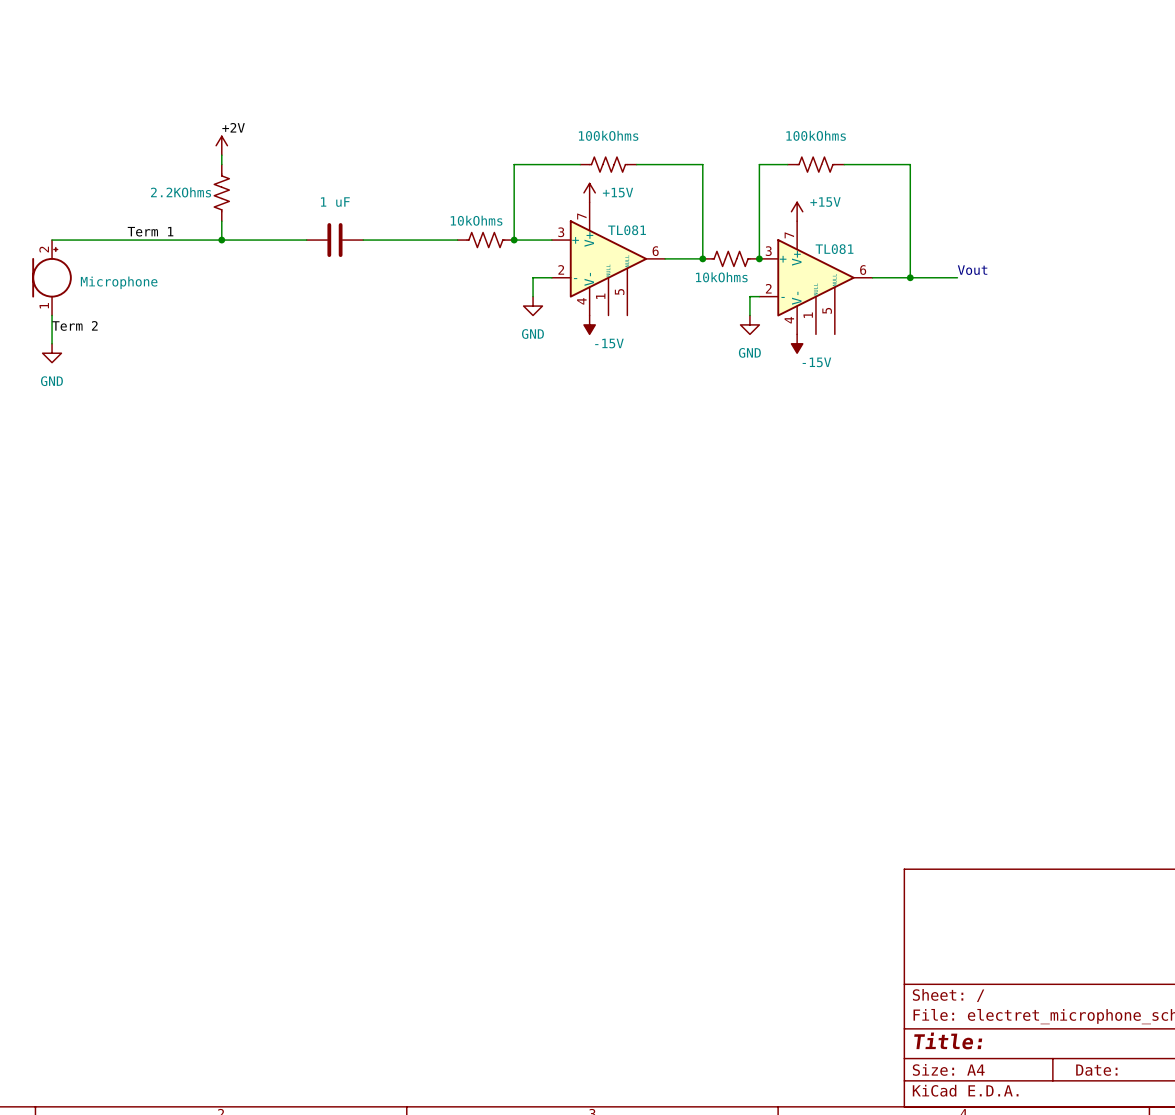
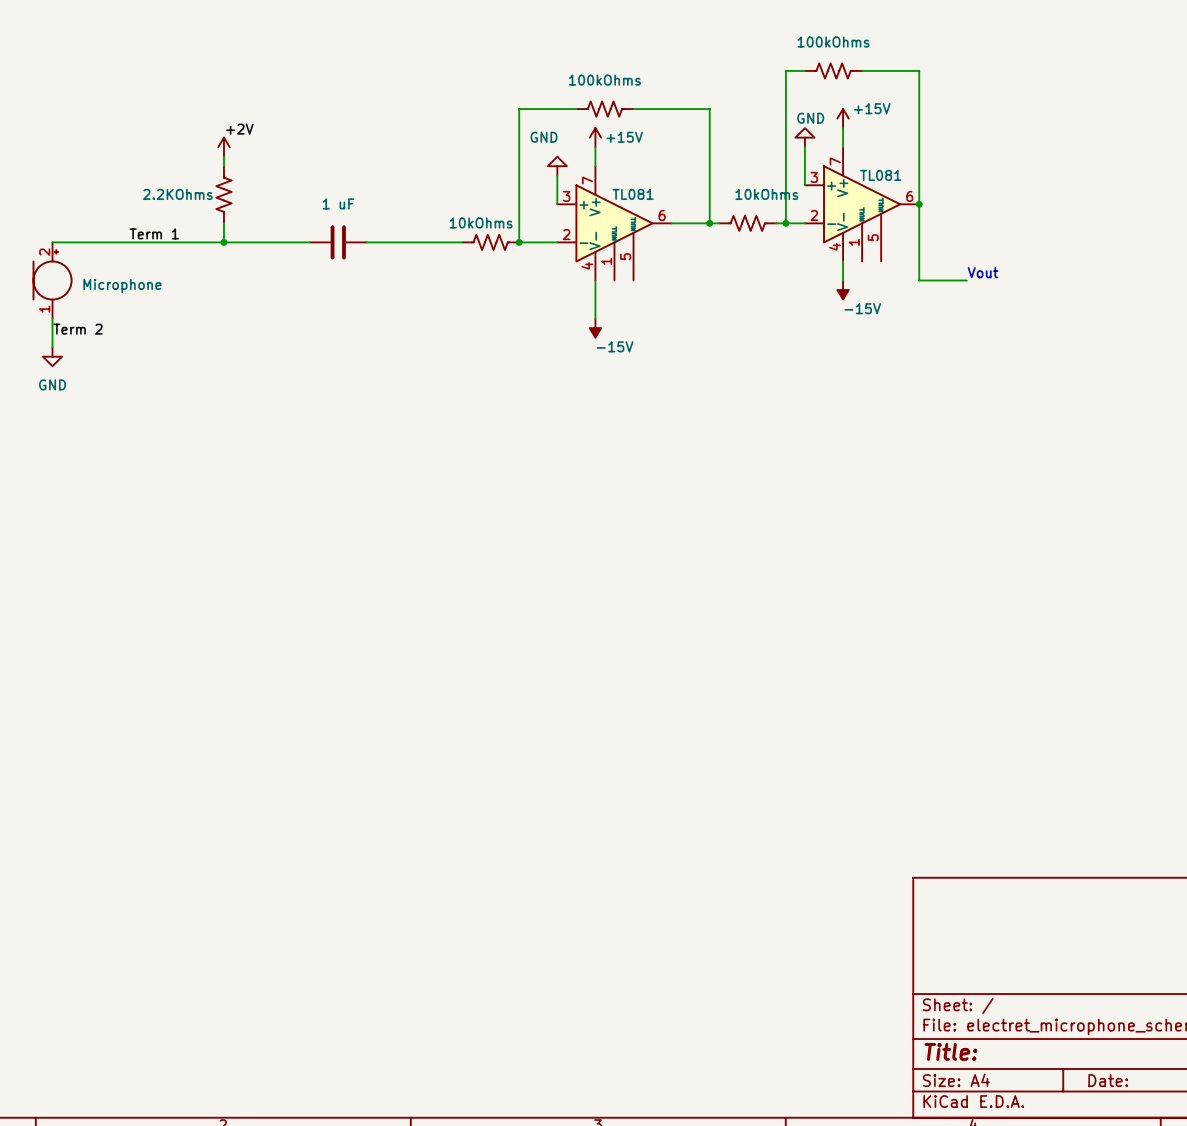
wire: none -> (804, 70) (785, 70) (785, 223)
wire: none -> (843, 128) (843, 147)
power symbol: none -> GND (804, 137)
wire: none -> (595, 147) (595, 166)
wire: none -> (804, 147) (804, 185)
wire: (514, 164) (580, 164) -> (519, 166) (519, 109) (576, 109)
power symbol: none -> GND (557, 166)
part position: (608, 164) -> (604, 109)
wire: (636, 164) (702, 164) -> (633, 109) (709, 109) (709, 166)
wire: (787, 164) (759, 164) (759, 258) -> none
part position: (815, 164) -> (833, 70)
wire: (844, 164) (910, 164) -> (862, 70) (919, 70) (919, 166)
wire: none -> (557, 175) (557, 204)
power symbol position: +15V (589, 192) -> +15V (595, 137)
junction: none -> (919, 204)
power symbol position: +15V (797, 211) -> +15V (843, 118)
wire: none -> (671, 223) (719, 223)
wire: (702, 221) (702, 258) (665, 258) -> none
junction: none -> (709, 223)
wire: none -> (776, 223) (804, 223)
junction: none -> (785, 223)
part position: (608, 258) -> (614, 223)
junction: (702, 258) -> none
part position: (731, 258) -> (747, 223)
junction: (759, 258) -> none
wire: (551, 277) (533, 277) (533, 296) -> none
part value position: 10kOhms (721, 277) -> 10kOhms (766, 194)
part position: (815, 277) -> (862, 204)
wire: (872, 277) (910, 277) -> none
junction: (910, 277) -> none
wire: (759, 296) (749, 296) (749, 315) -> none
power symbol: GND (533, 306) -> none
power symbol: GND (749, 324) -> none
power symbol position: -15V (797, 343) -> -15V (843, 290)

